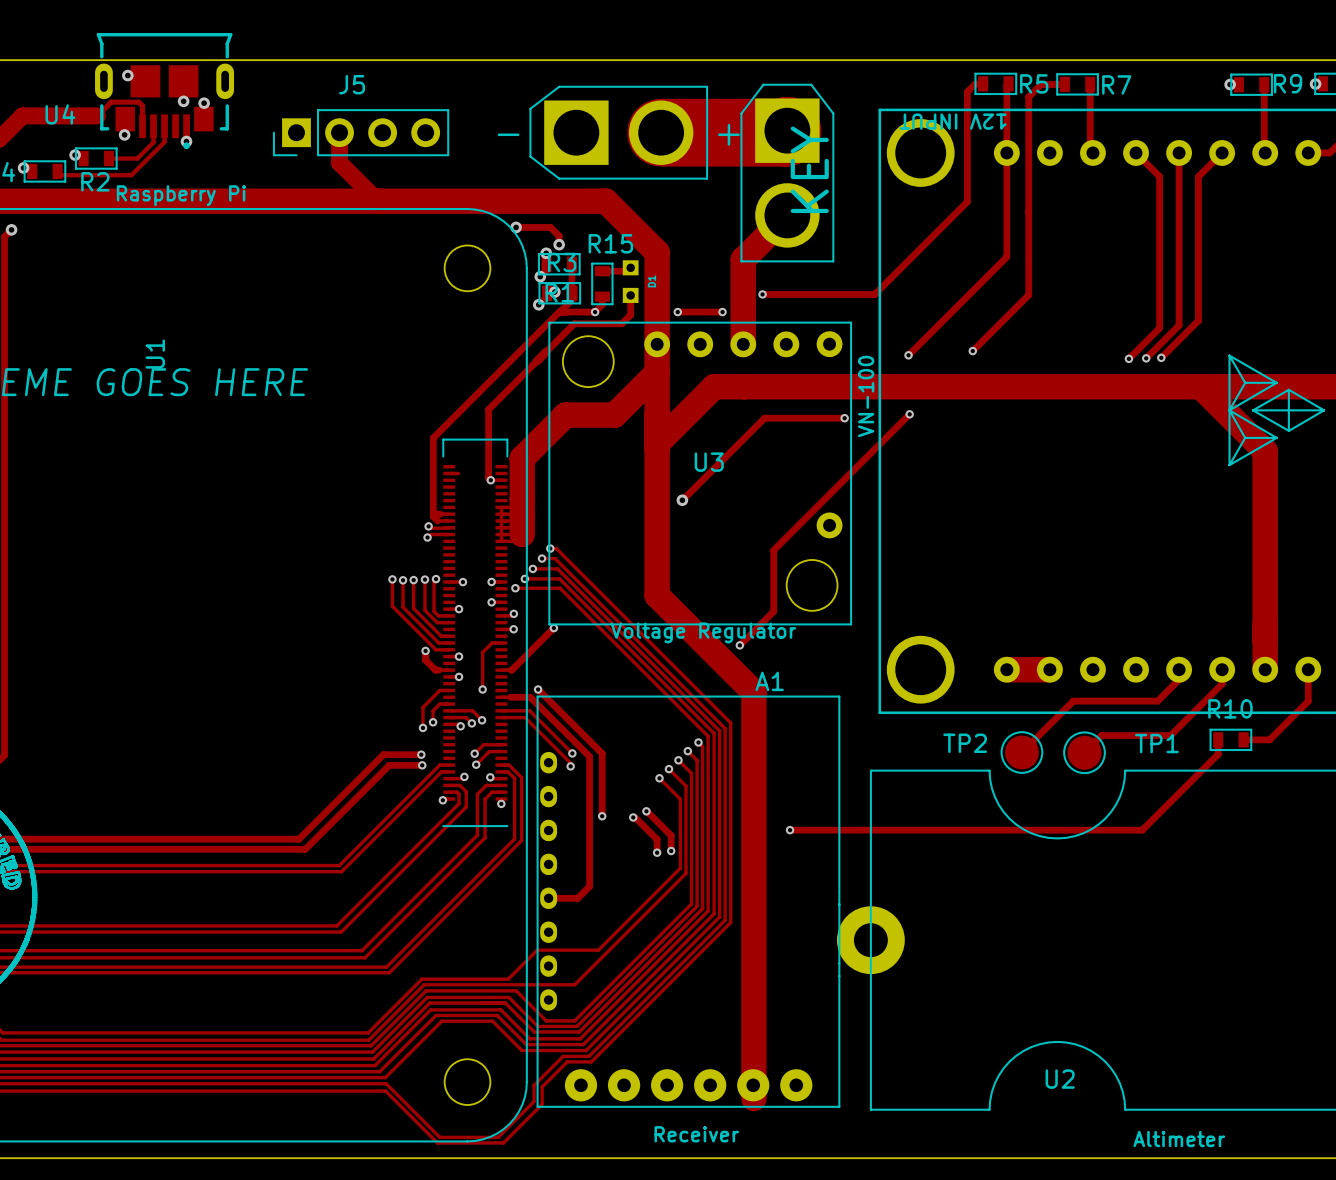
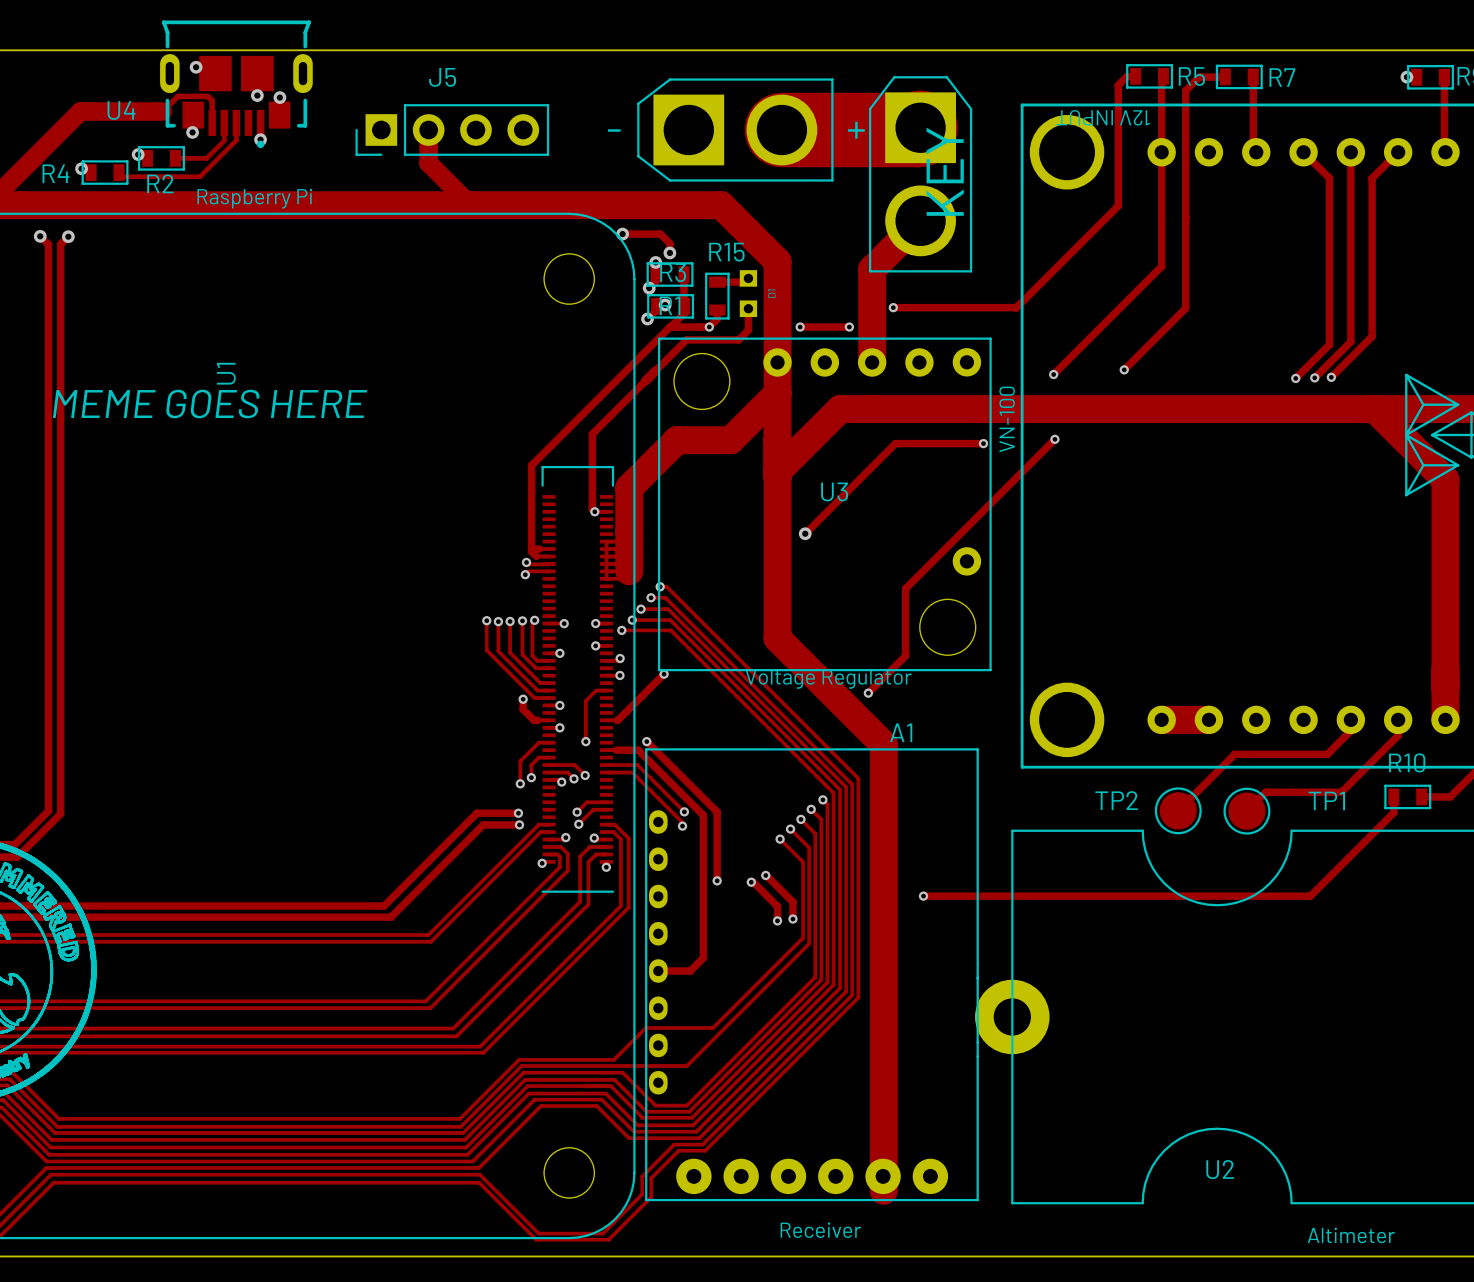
track: (449, 473) (458, 473) -> none

